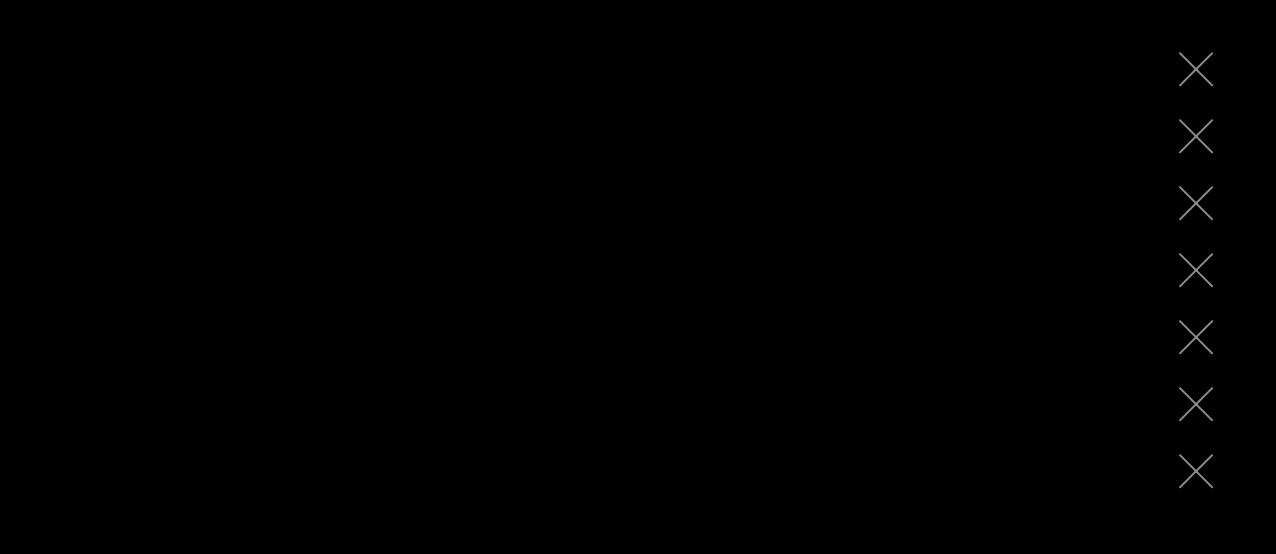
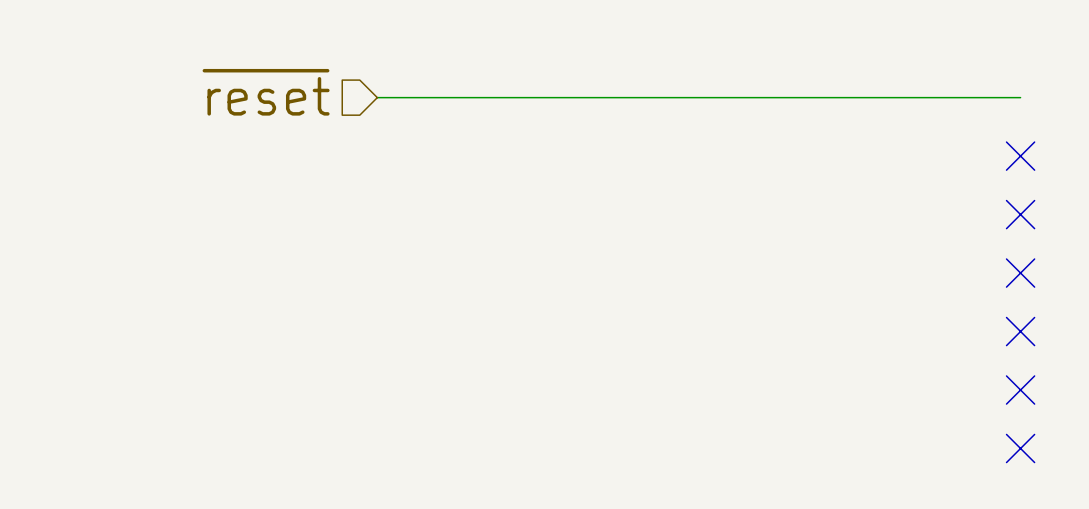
hierarchical label: none -> ~{reset} (266, 92)
wire: none -> (377, 97) (1020, 97)
no-connect mark: (1196, 69) -> none

